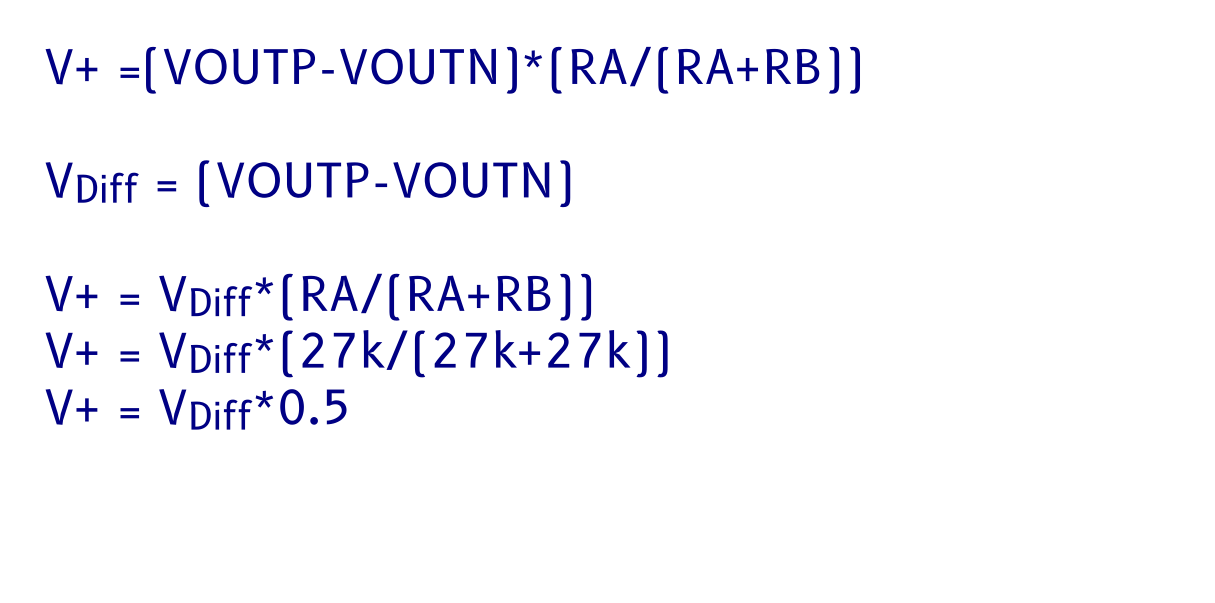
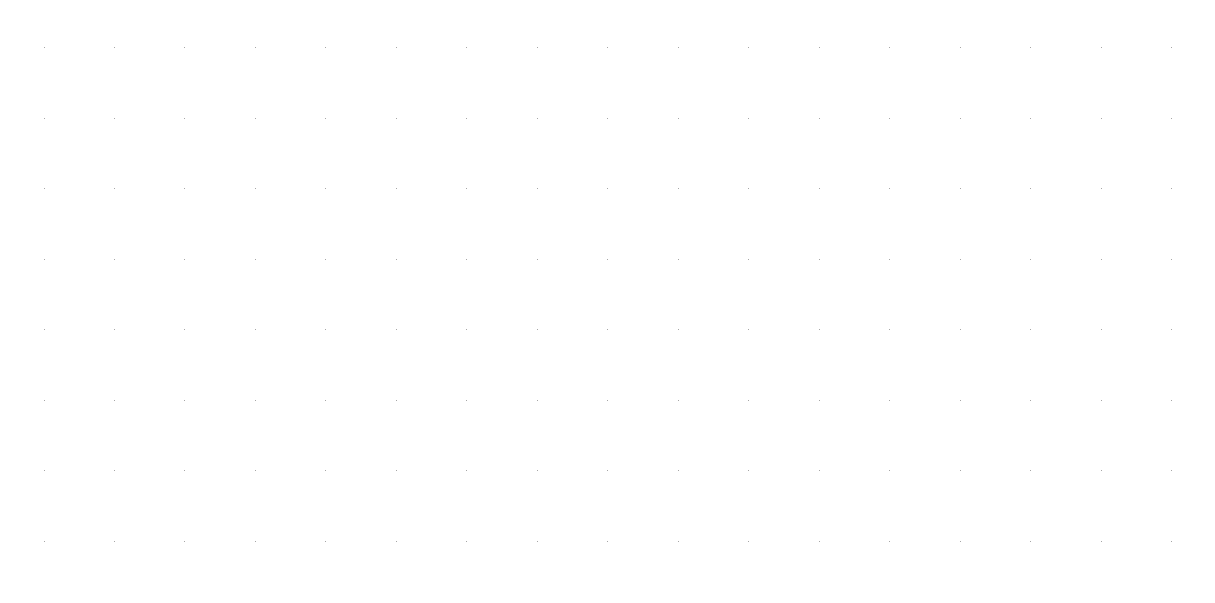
text: V+ =(VOUTP-VOUTN)*(RA/(RA+RB)) (452, 70) -> none
text: VDiff = (VOUTP-VOUTN) (307, 183) -> none
text: V+ = VDiff*(RA/(RA+RB)) (318, 297) -> none
text: V+ = VDiff*(27k/(27k+27k)) (356, 353) -> none
text: V+ = VDiff*0.5 (196, 409) -> none

